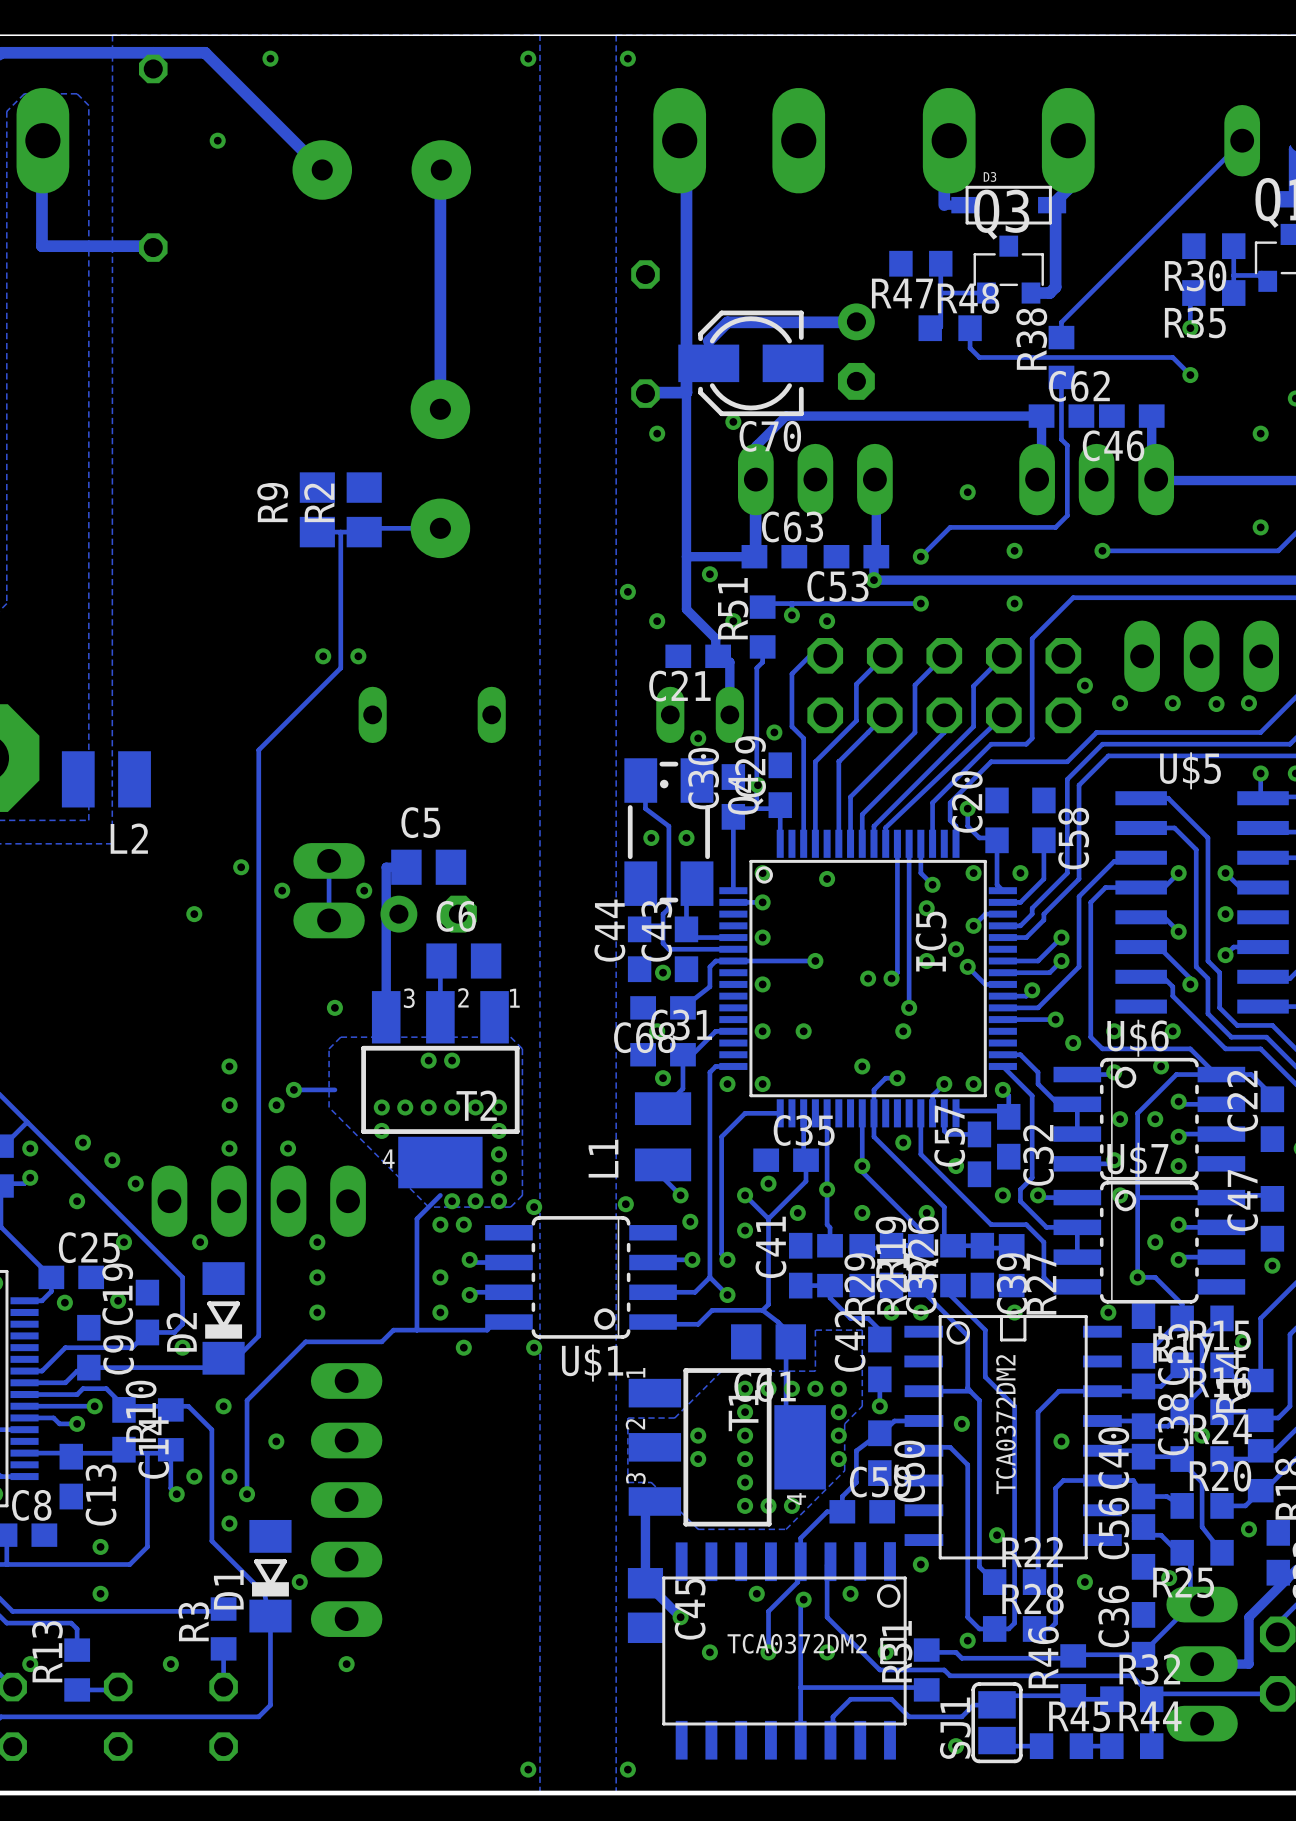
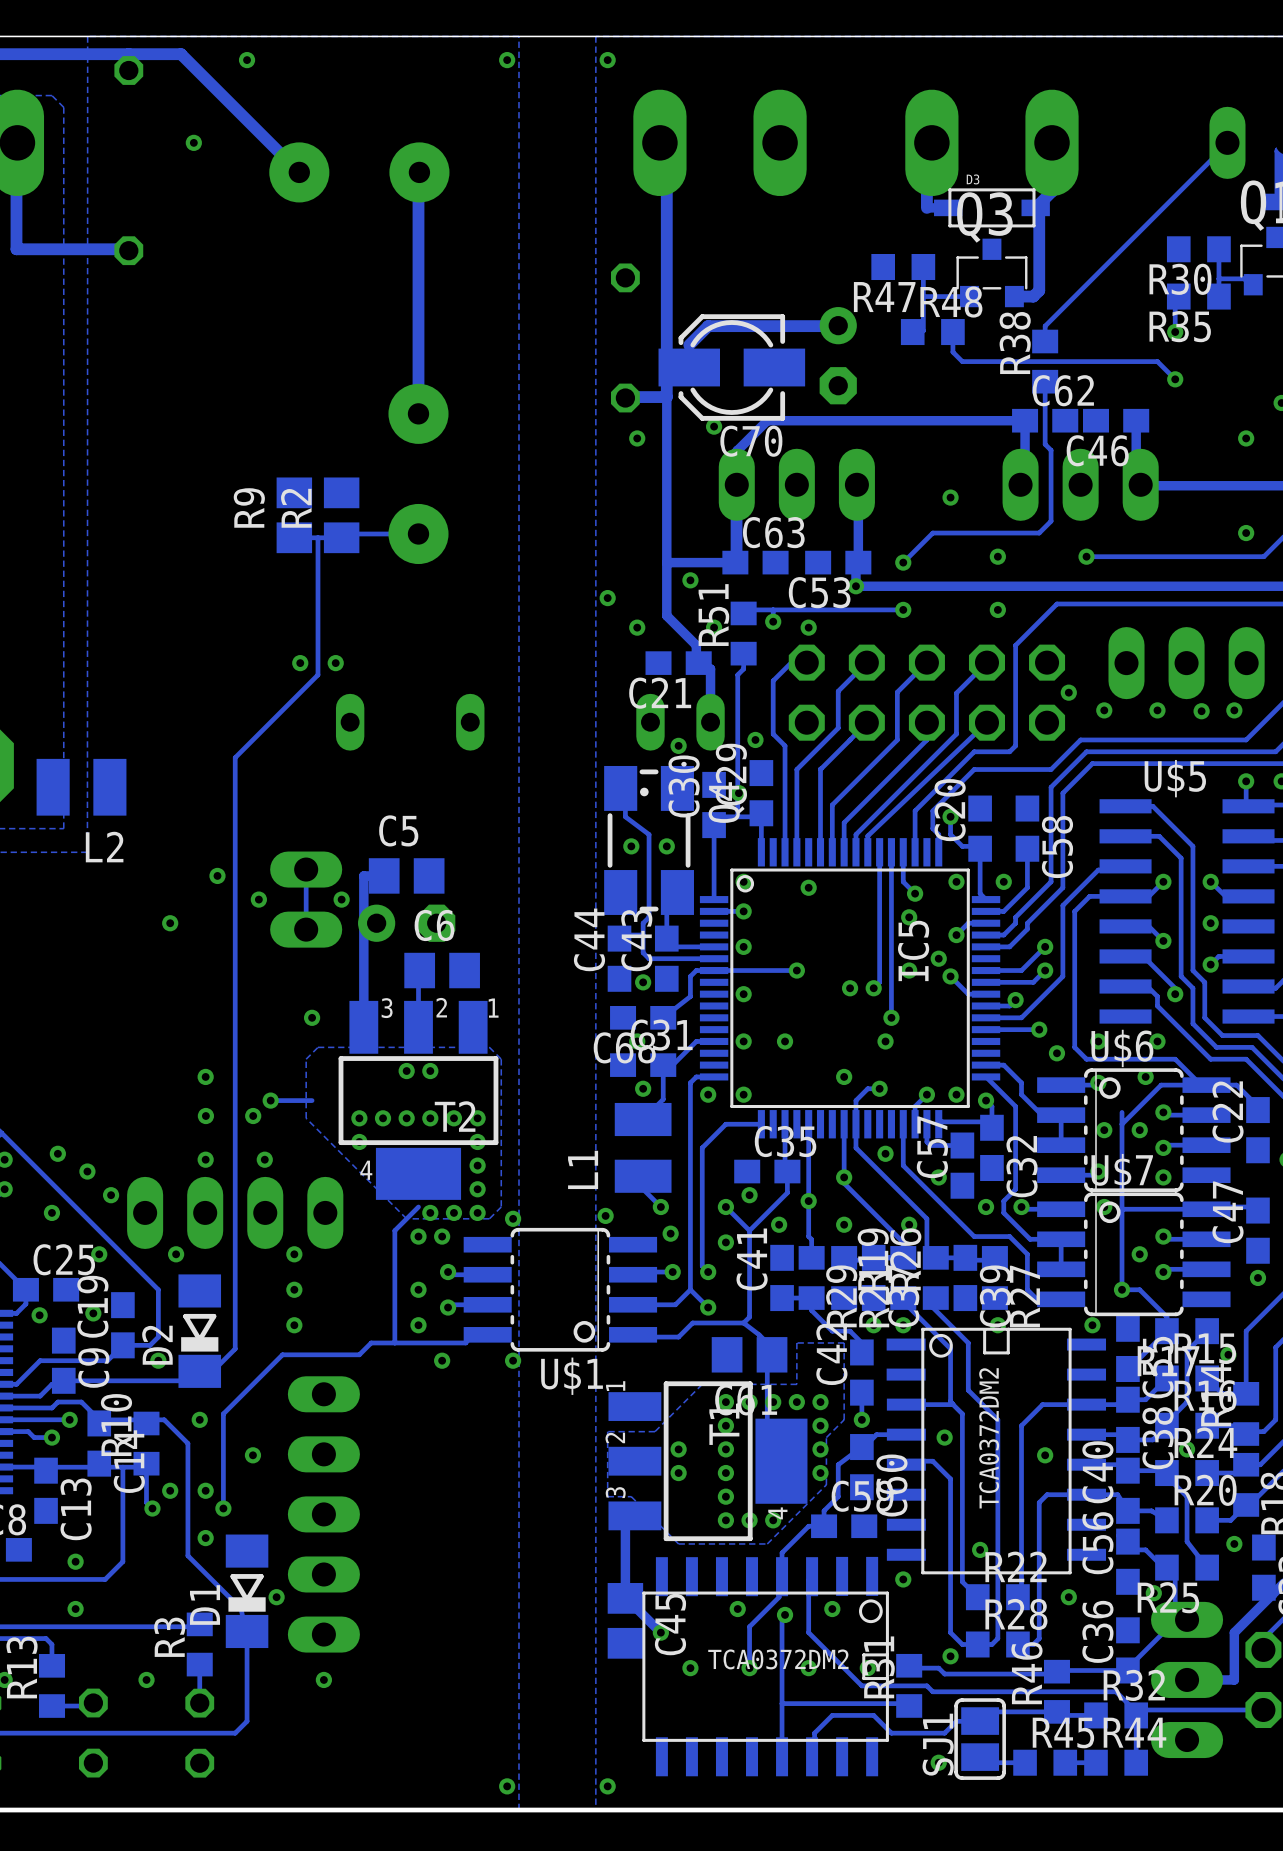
track: none -> (1122, 1112) (1122, 1124)

